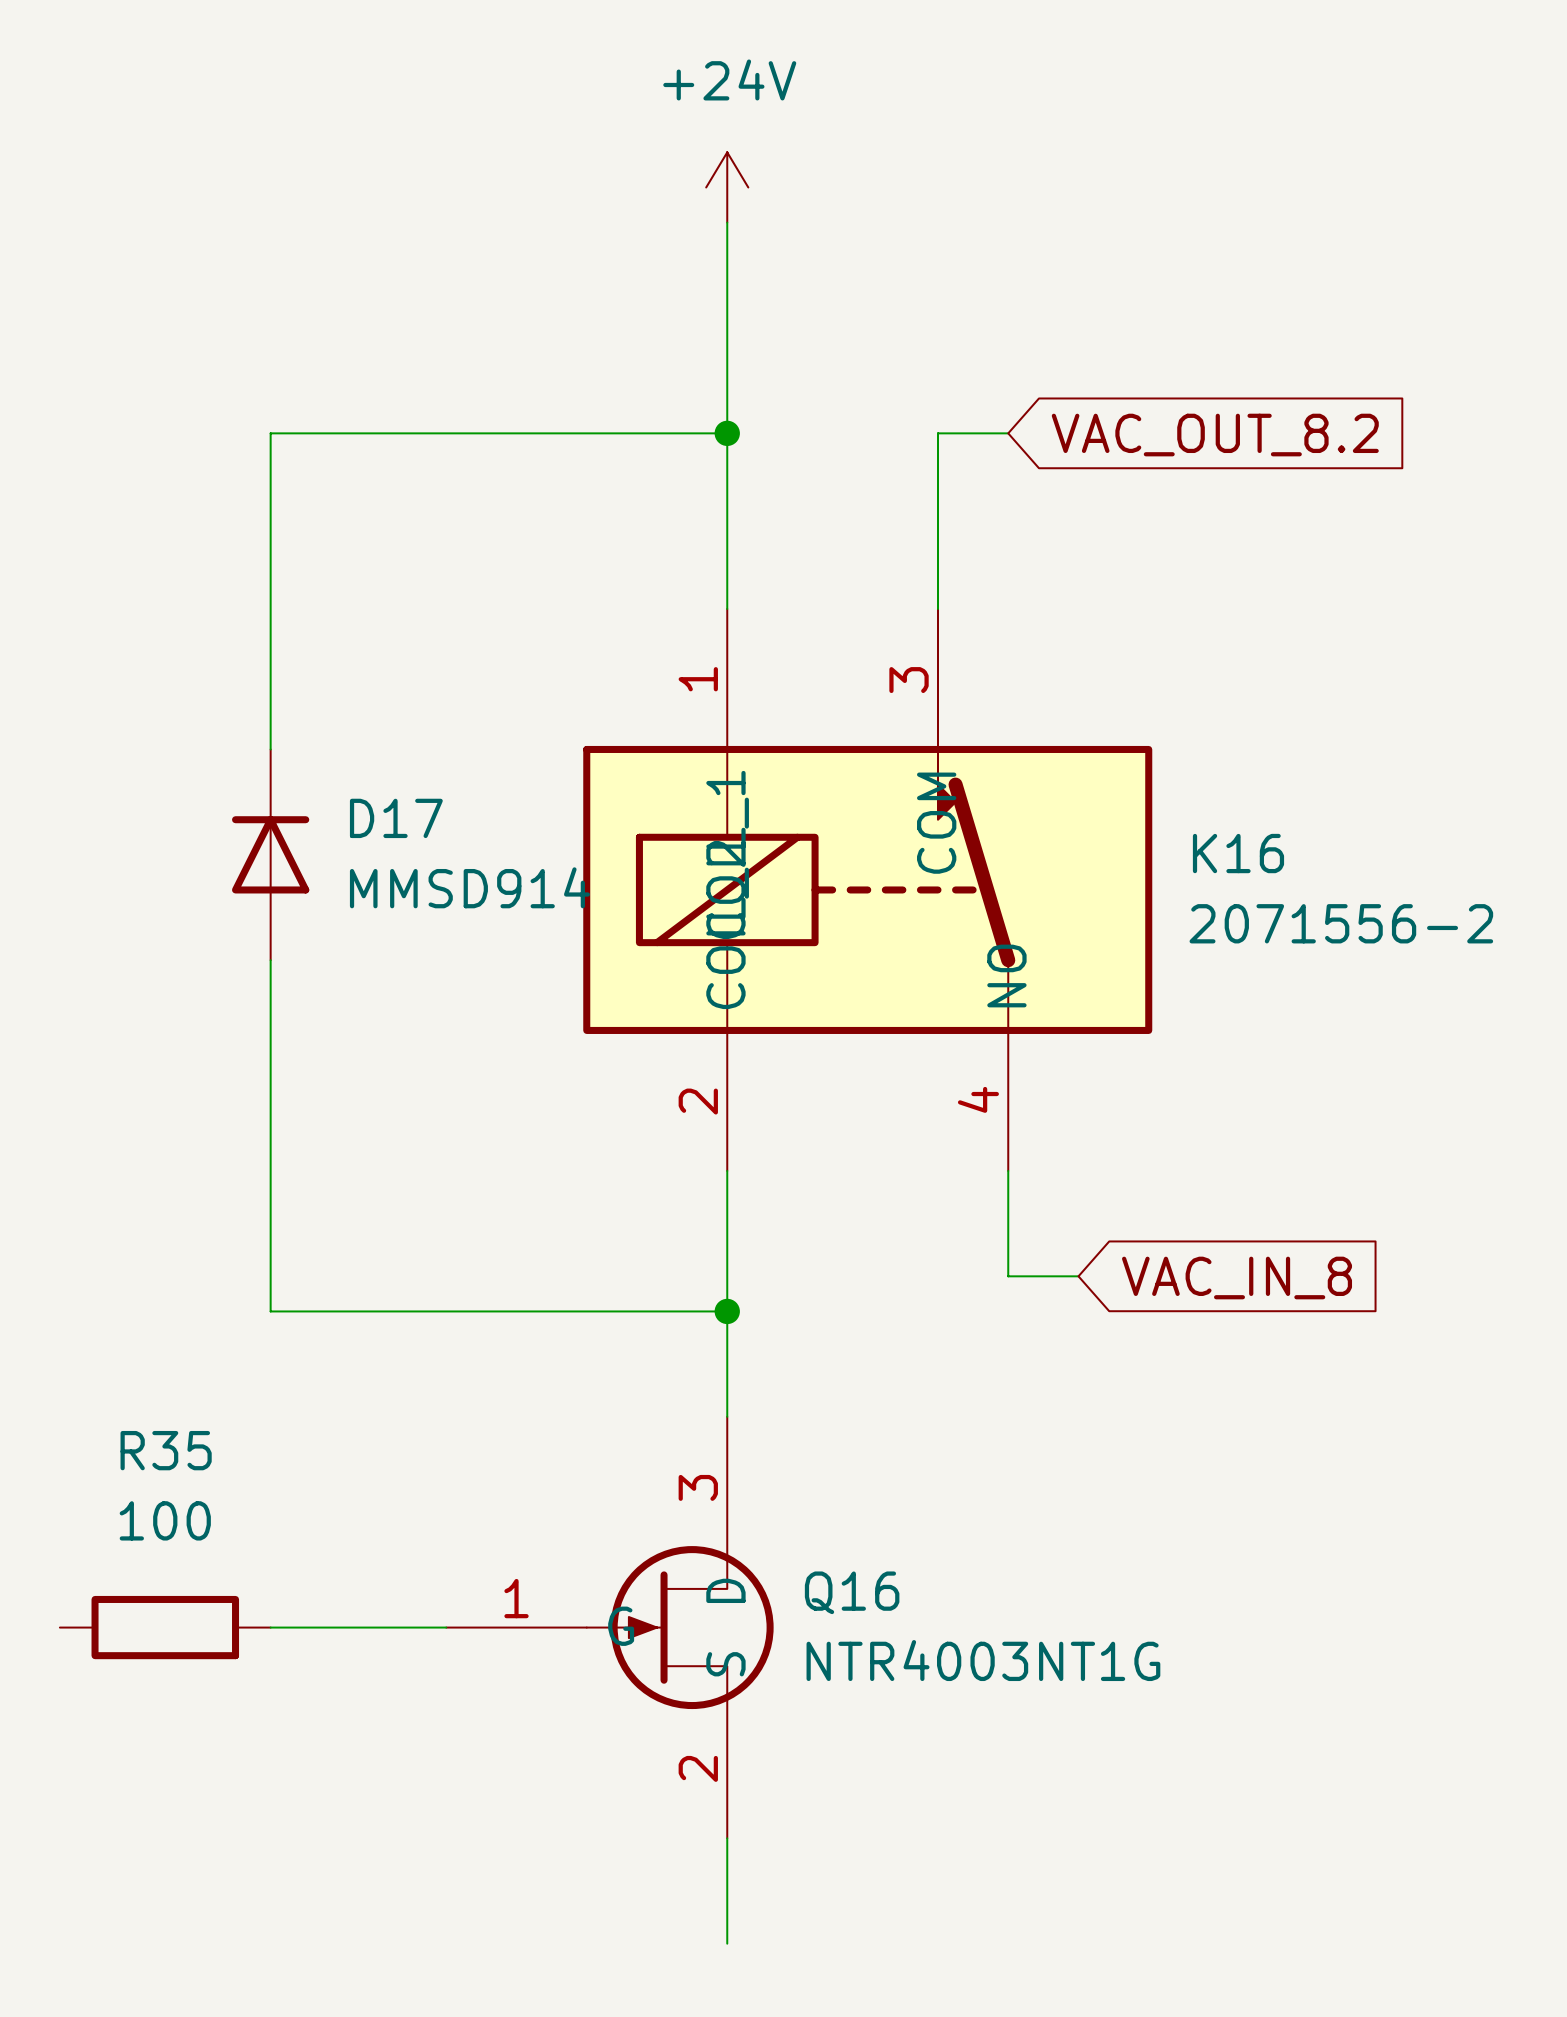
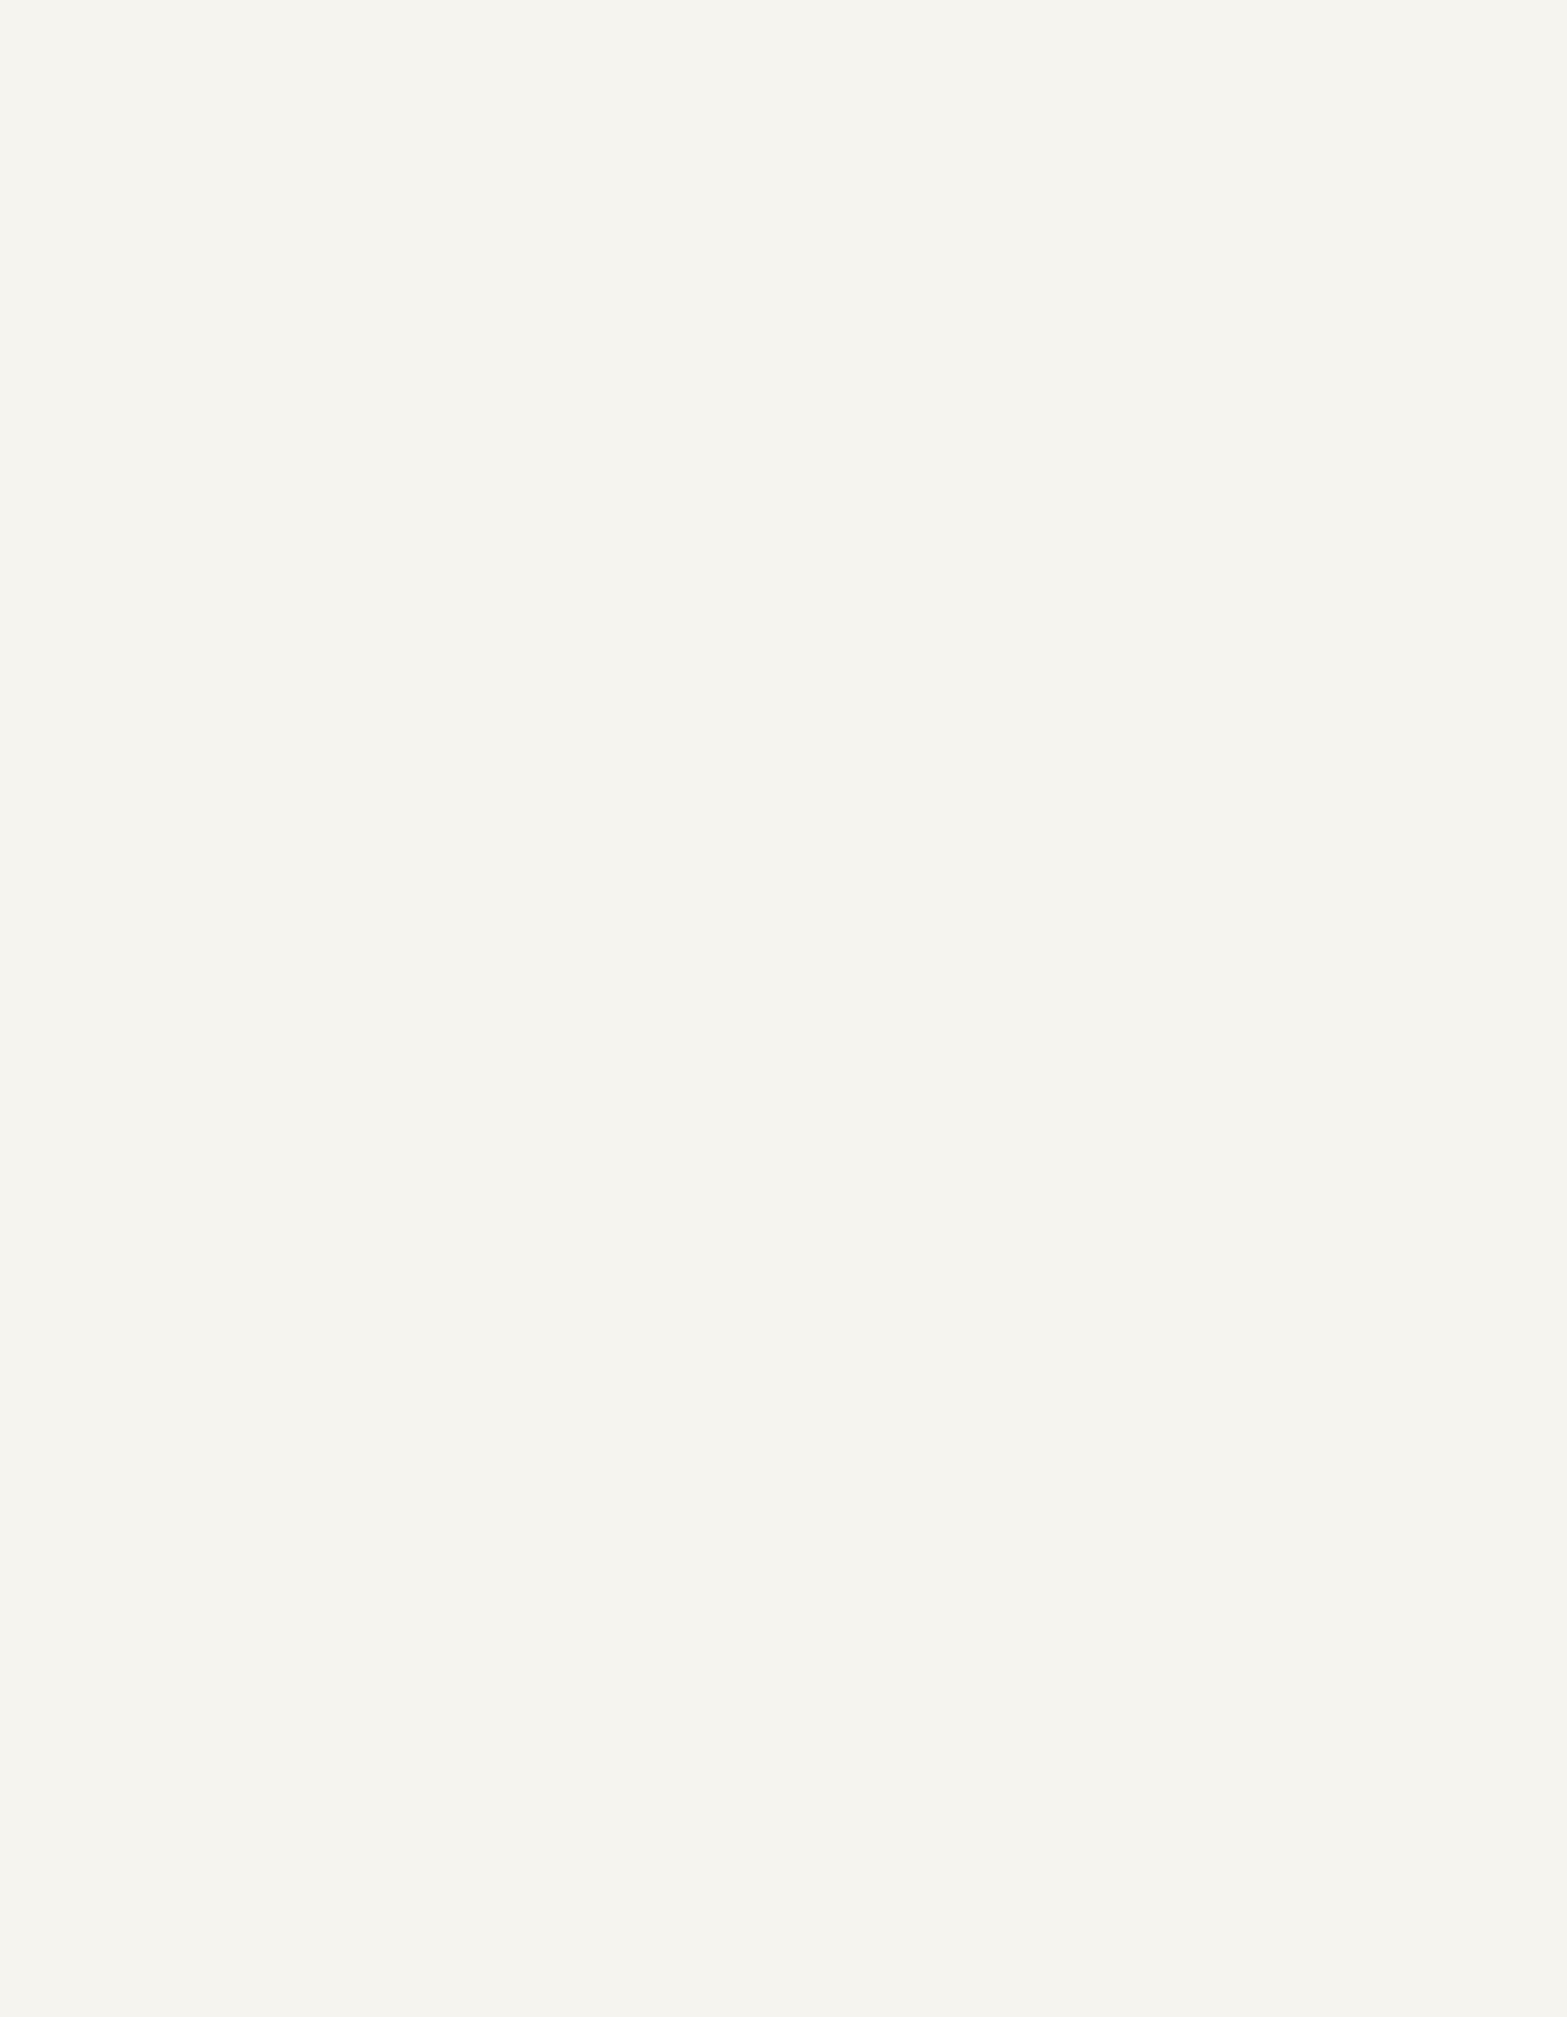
power symbol: +24V (727, 187) -> none
wire: (727, 222) (727, 608) -> none
wire: (727, 433) (270, 433) (270, 749) -> none
junction: (727, 433) -> none
wire: (1008, 433) (938, 433) (938, 608) -> none
global label: VAC_OUT_8.2 (1215, 435) -> none
D17: MMSD914 (270, 854) -> none
K16: 2071556-2 (867, 889) -> none
wire: (270, 960) (270, 1311) (727, 1311) -> none
wire: (727, 1170) (727, 1416) -> none
wire: (1008, 1170) (1008, 1276) (1078, 1276) -> none
global label: VAC_IN_8 (1237, 1278) -> none
junction: (727, 1311) -> none
R35: 100 (165, 1627) -> none
wire: (270, 1627) (446, 1627) -> none
Q16: NTR4003NT1G (609, 1627) -> none
wire: (727, 1838) (727, 1943) -> none

